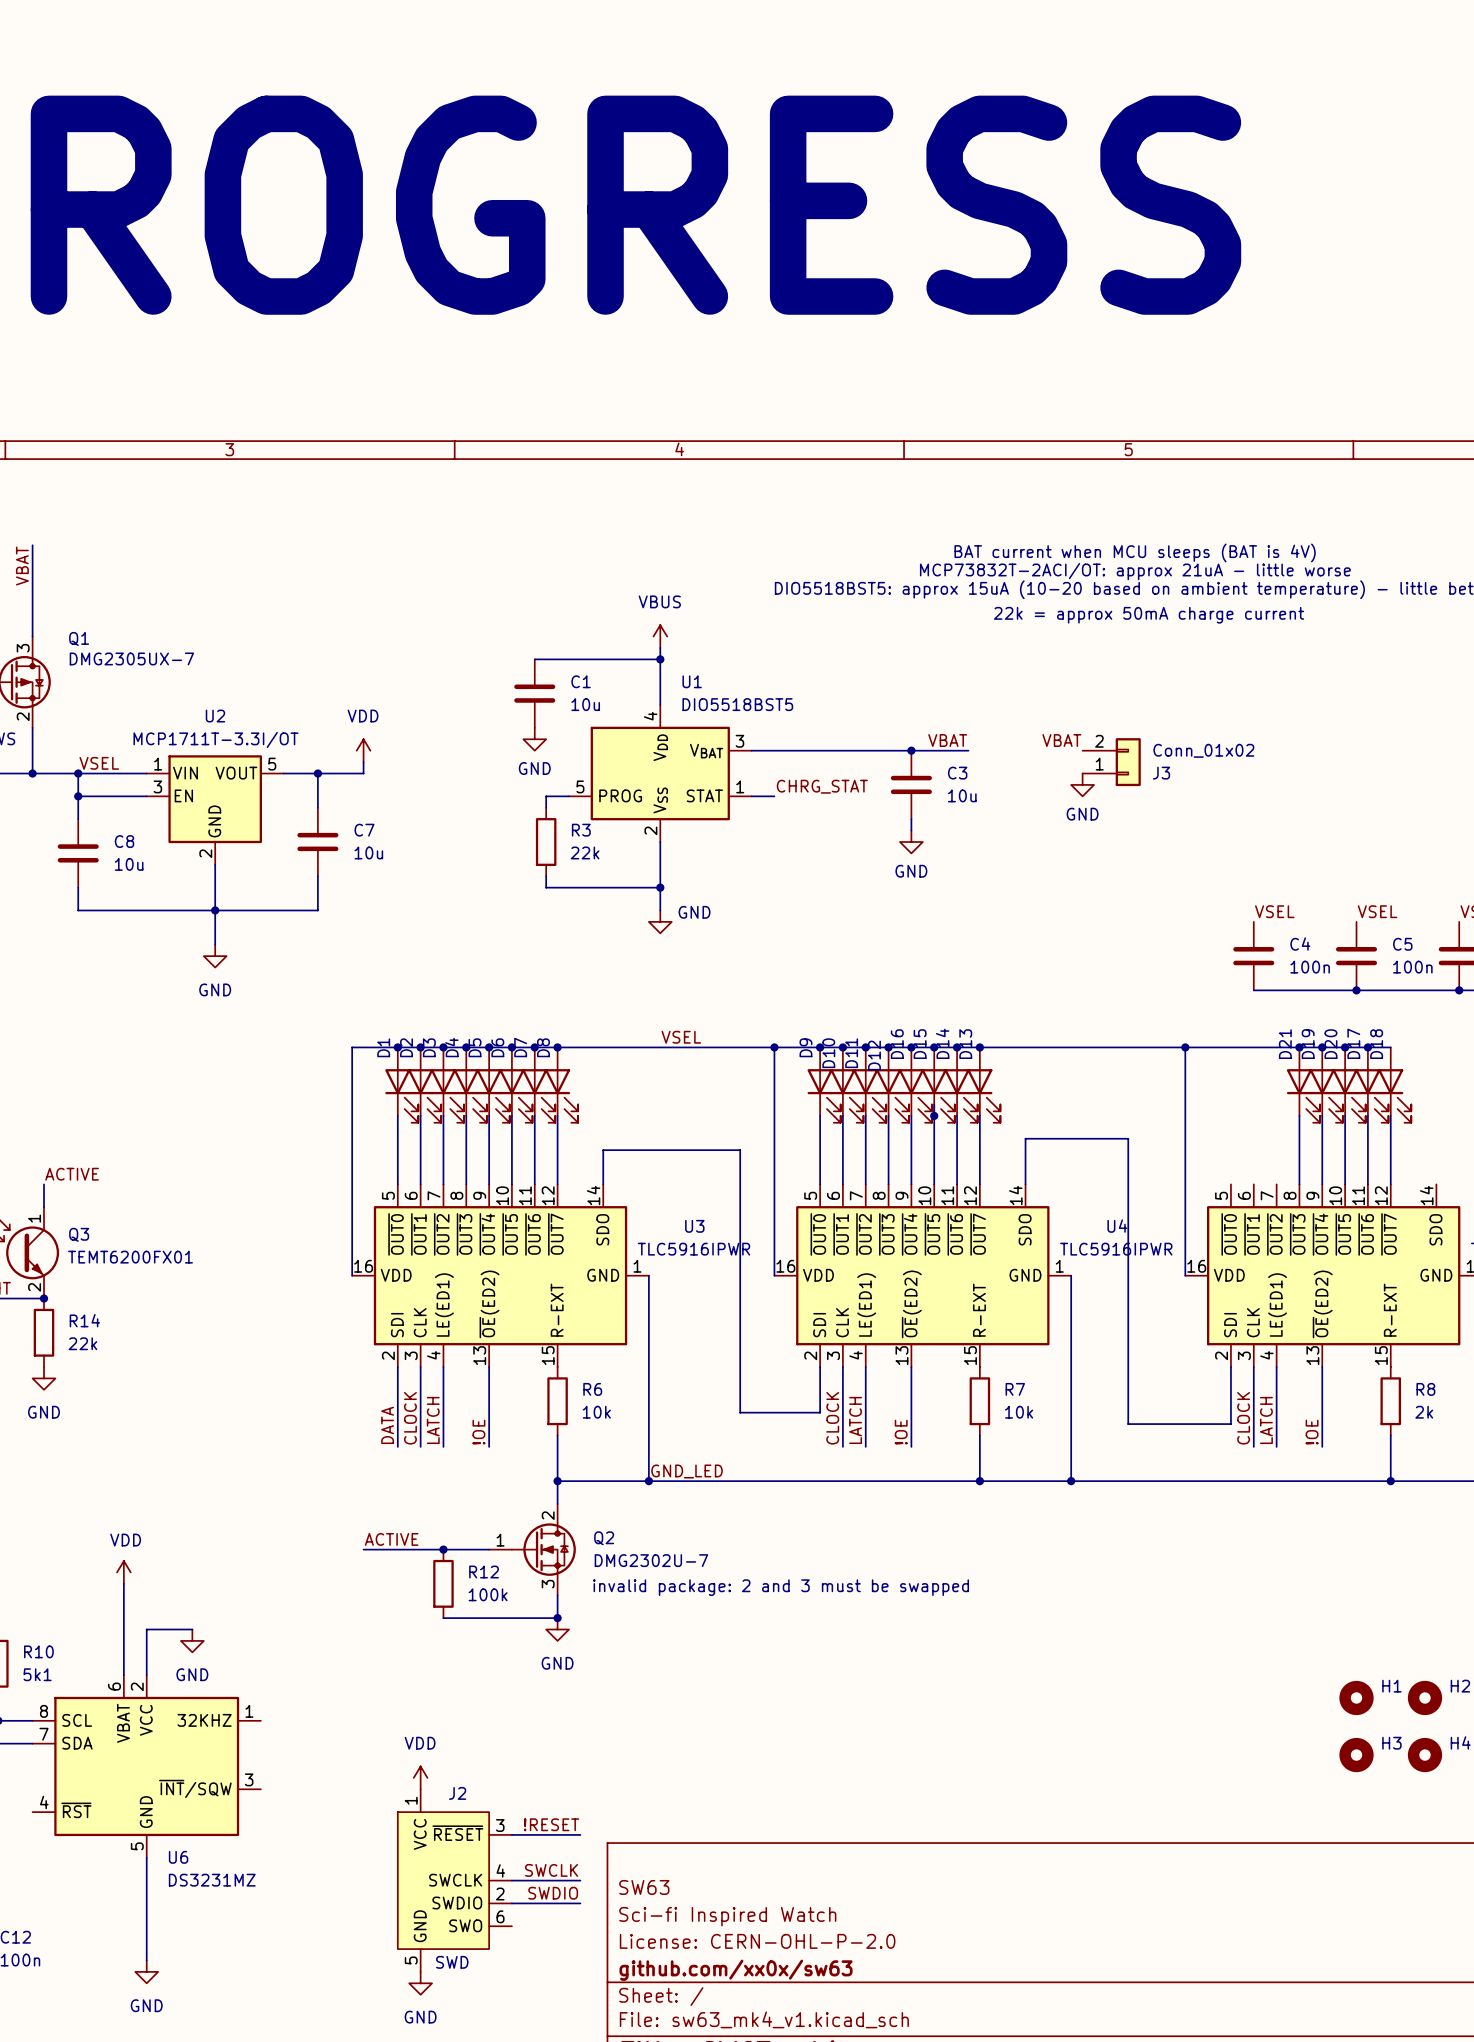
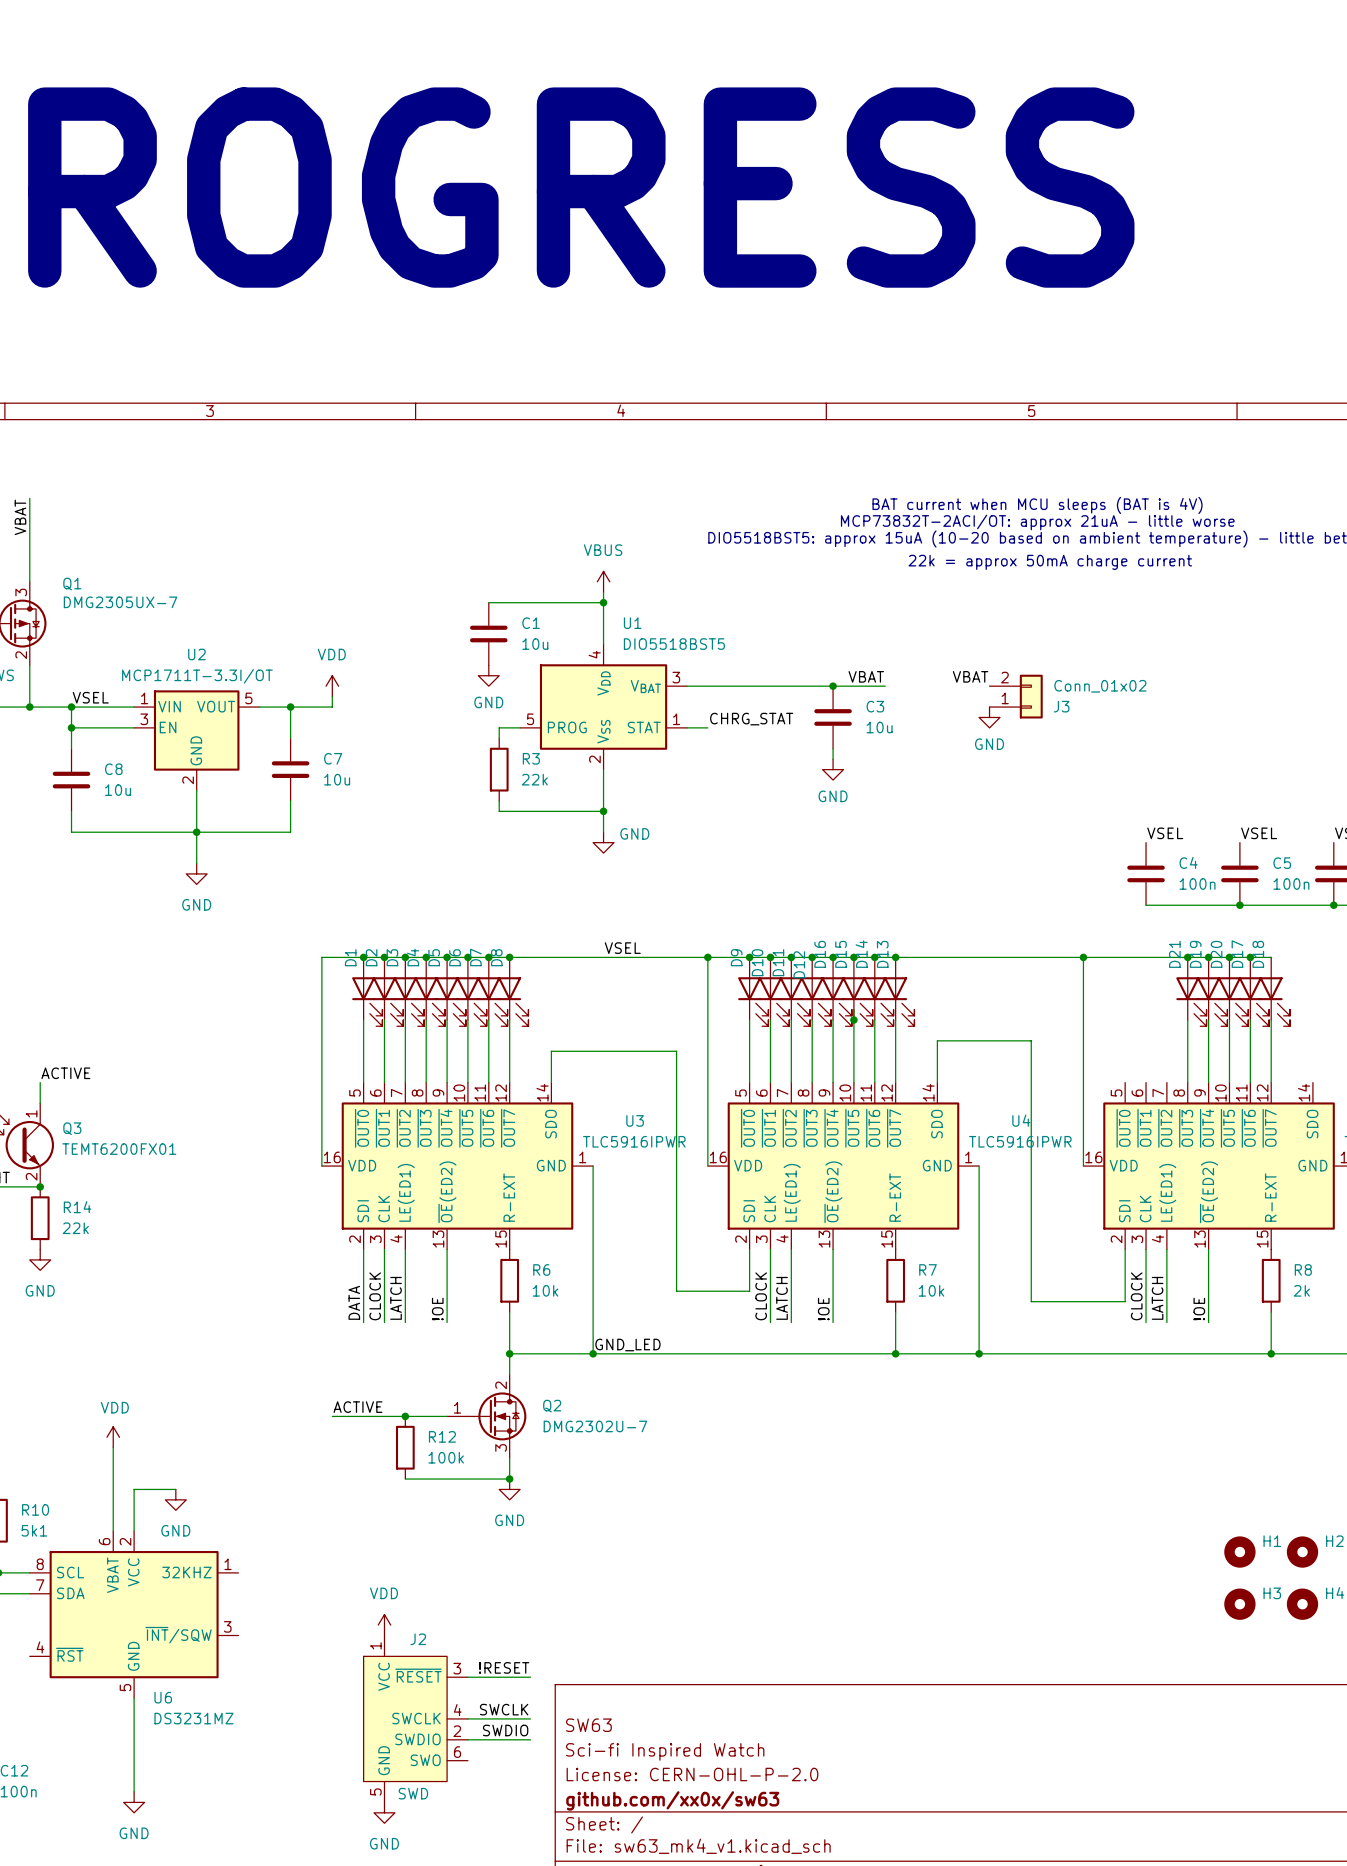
text: invalid package: 2 and 3 must be swapped (781, 1587) -> none

